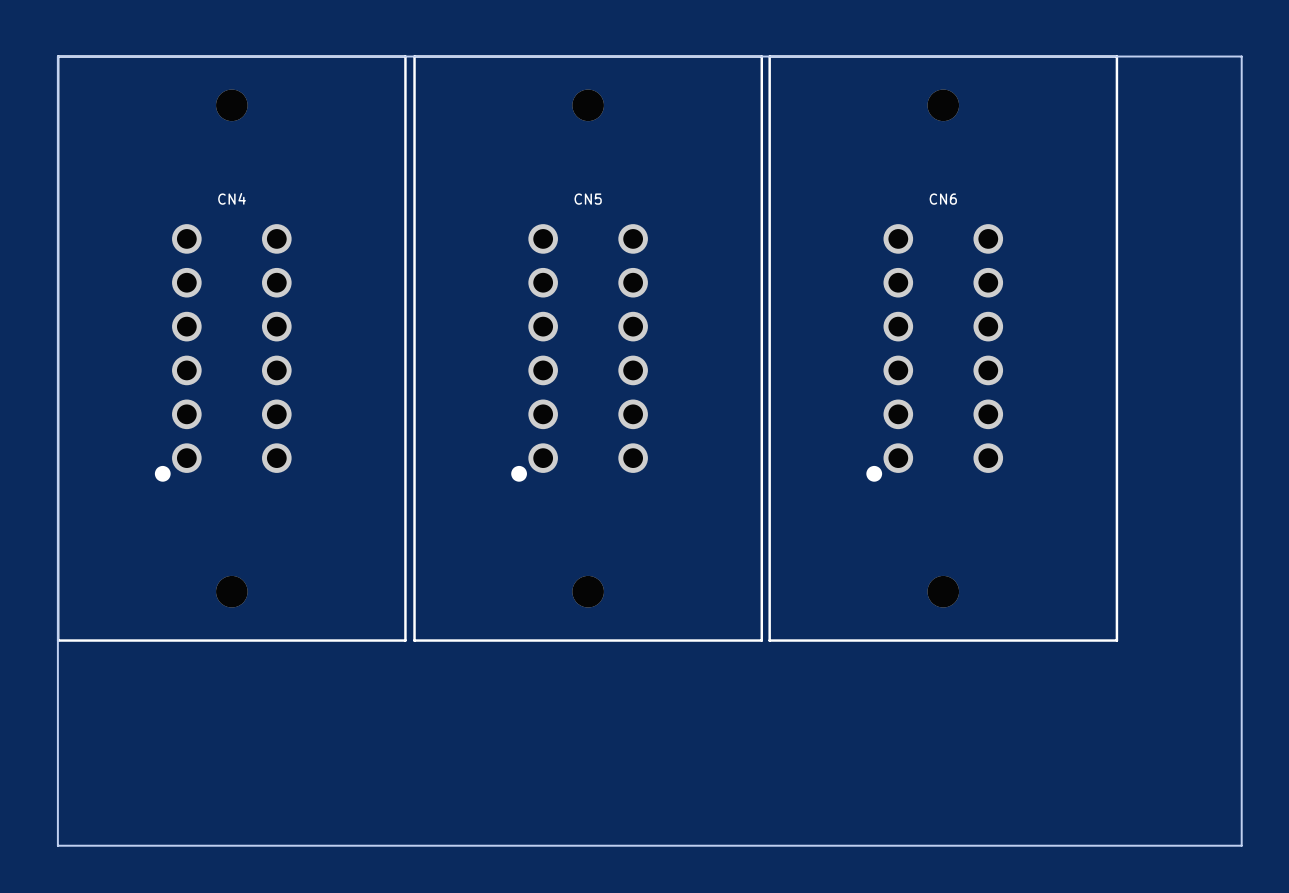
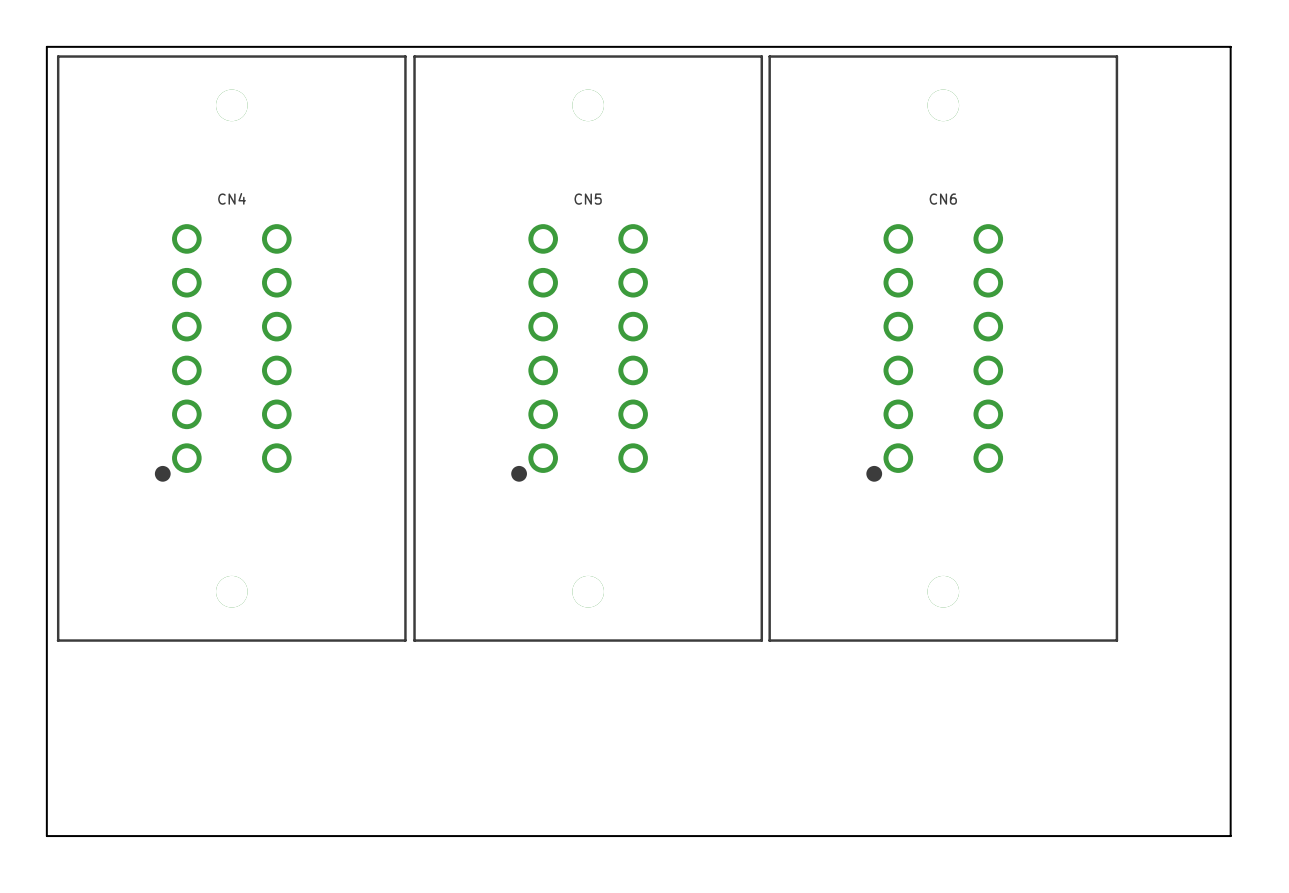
board edge: (57, 56) (1241, 56) (1241, 845) (57, 845) (57, 56) -> (46, 46) (1230, 46) (1230, 836) (46, 836) (46, 46)

